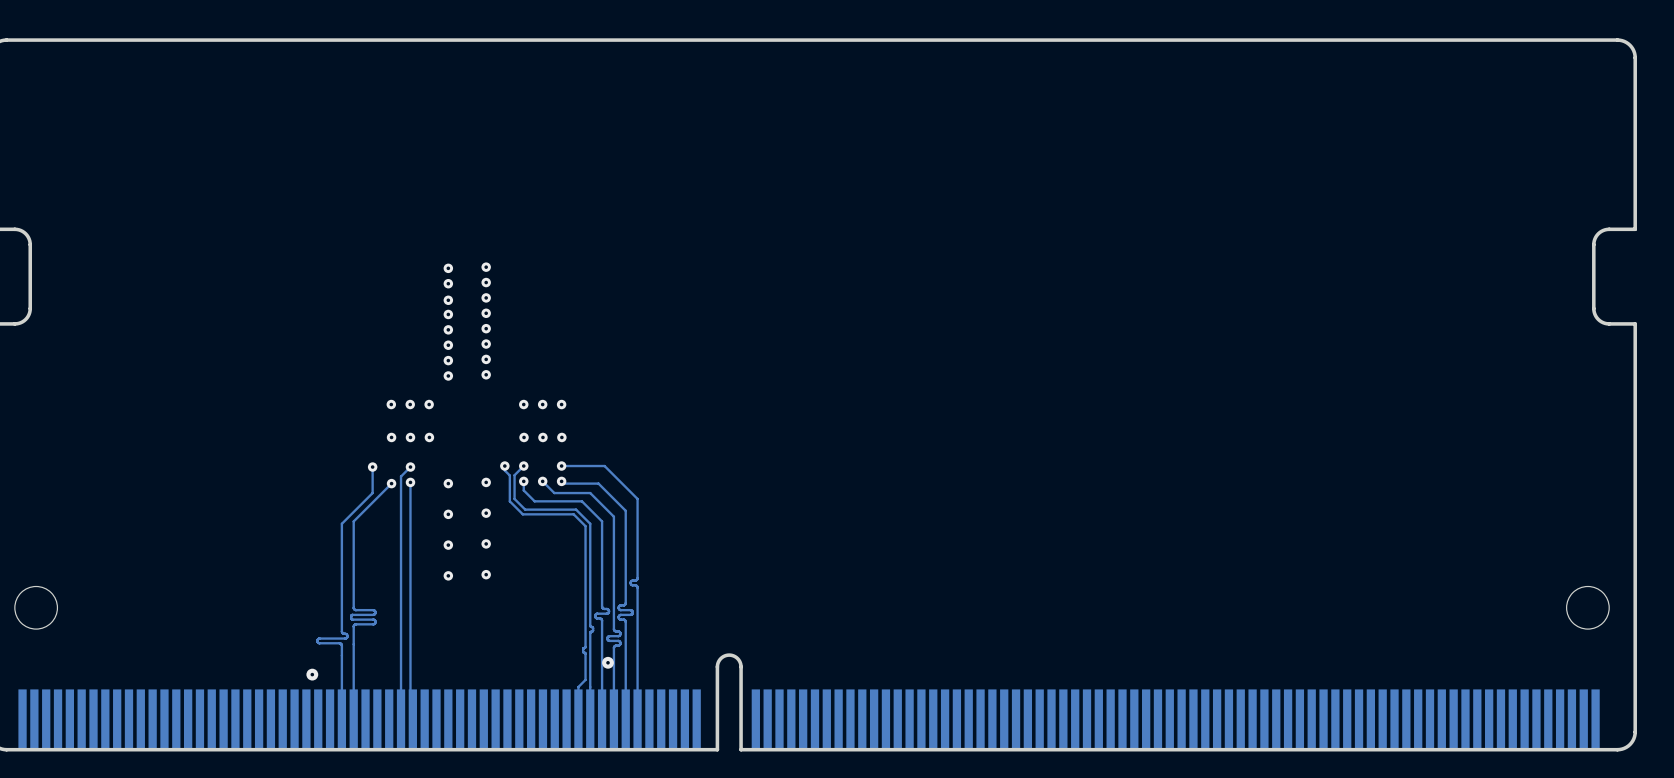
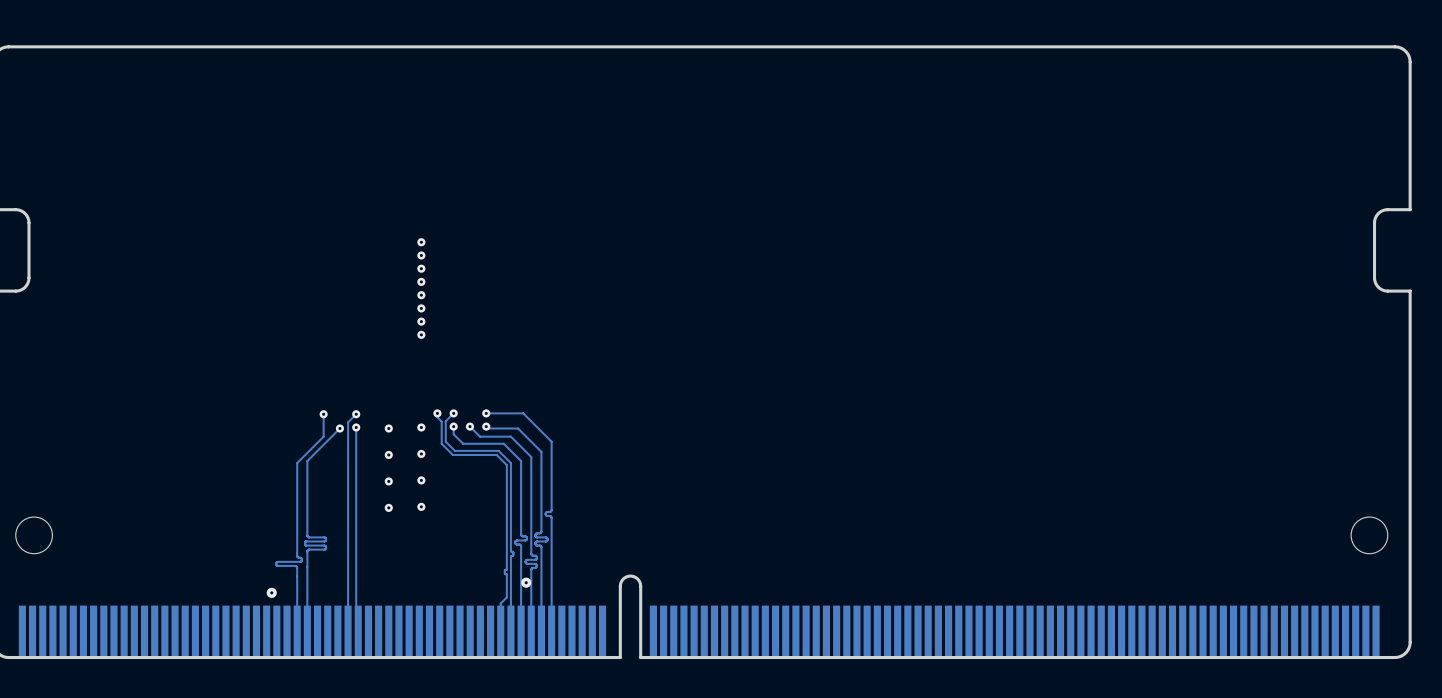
via: (448, 268) -> none
via: (448, 283) -> none
via: (448, 300) -> none
via: (448, 314) -> none
via: (448, 329) -> none
via: (448, 345) -> none
via: (448, 360) -> none
via: (448, 375) -> none
via: (391, 404) -> none
via: (410, 404) -> none
via: (429, 404) -> none
via: (523, 404) -> none
via: (542, 404) -> none
via: (561, 404) -> none
via: (391, 437) -> none
via: (410, 437) -> none
via: (429, 437) -> none
via: (524, 437) -> none
via: (542, 437) -> none
via: (561, 437) -> none

